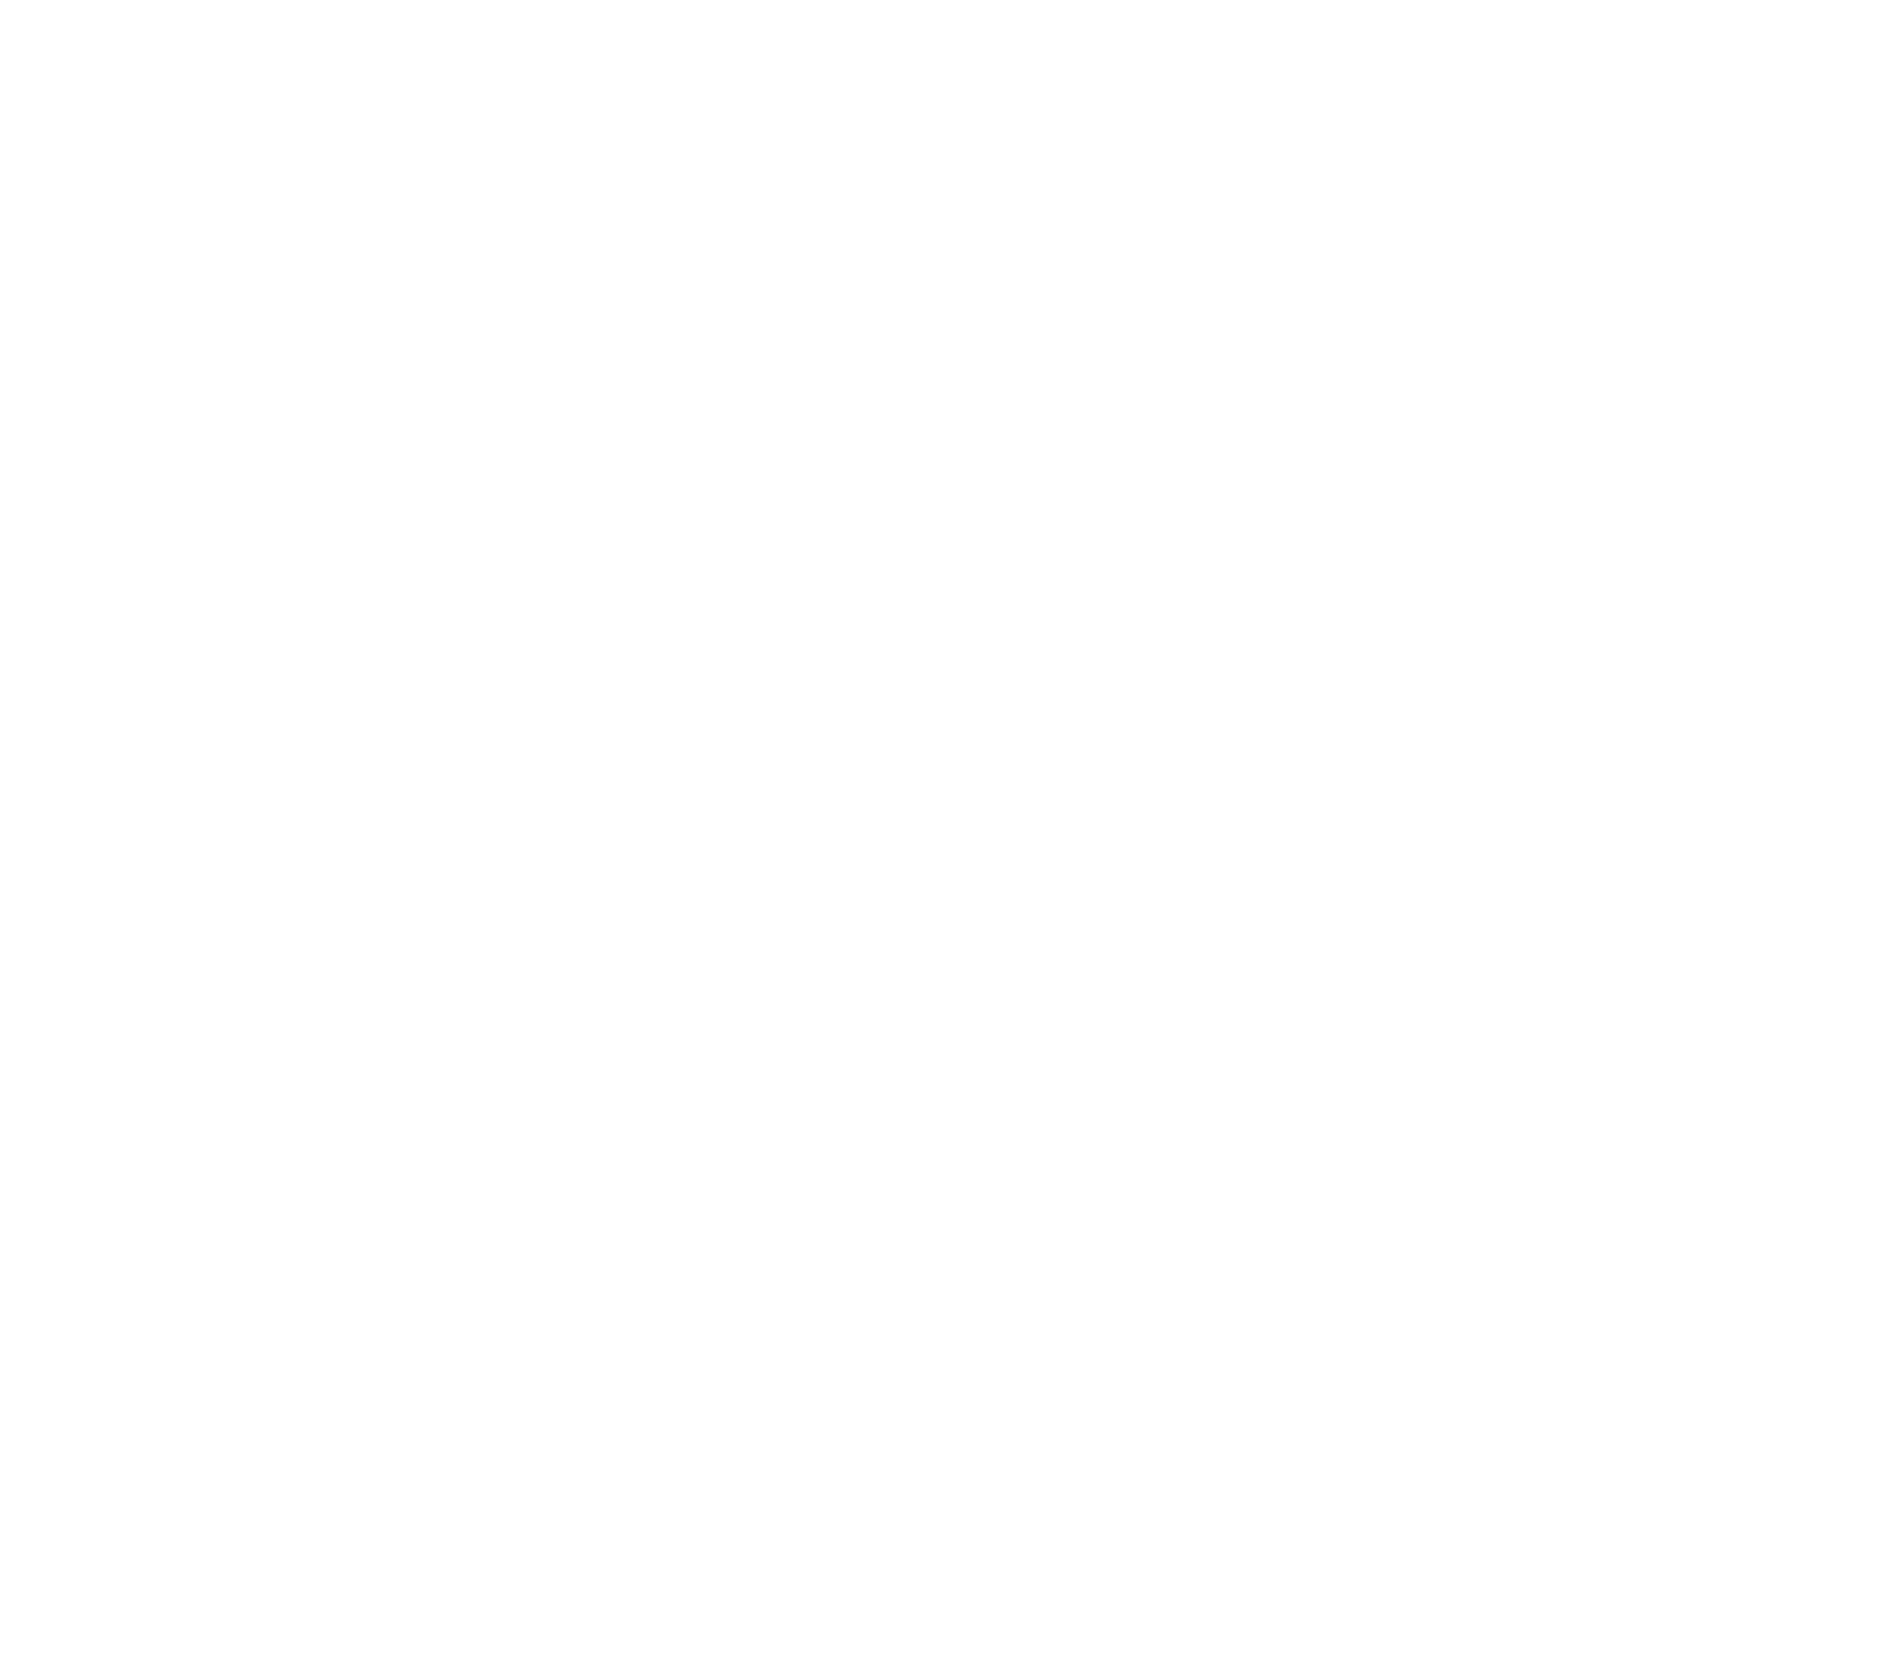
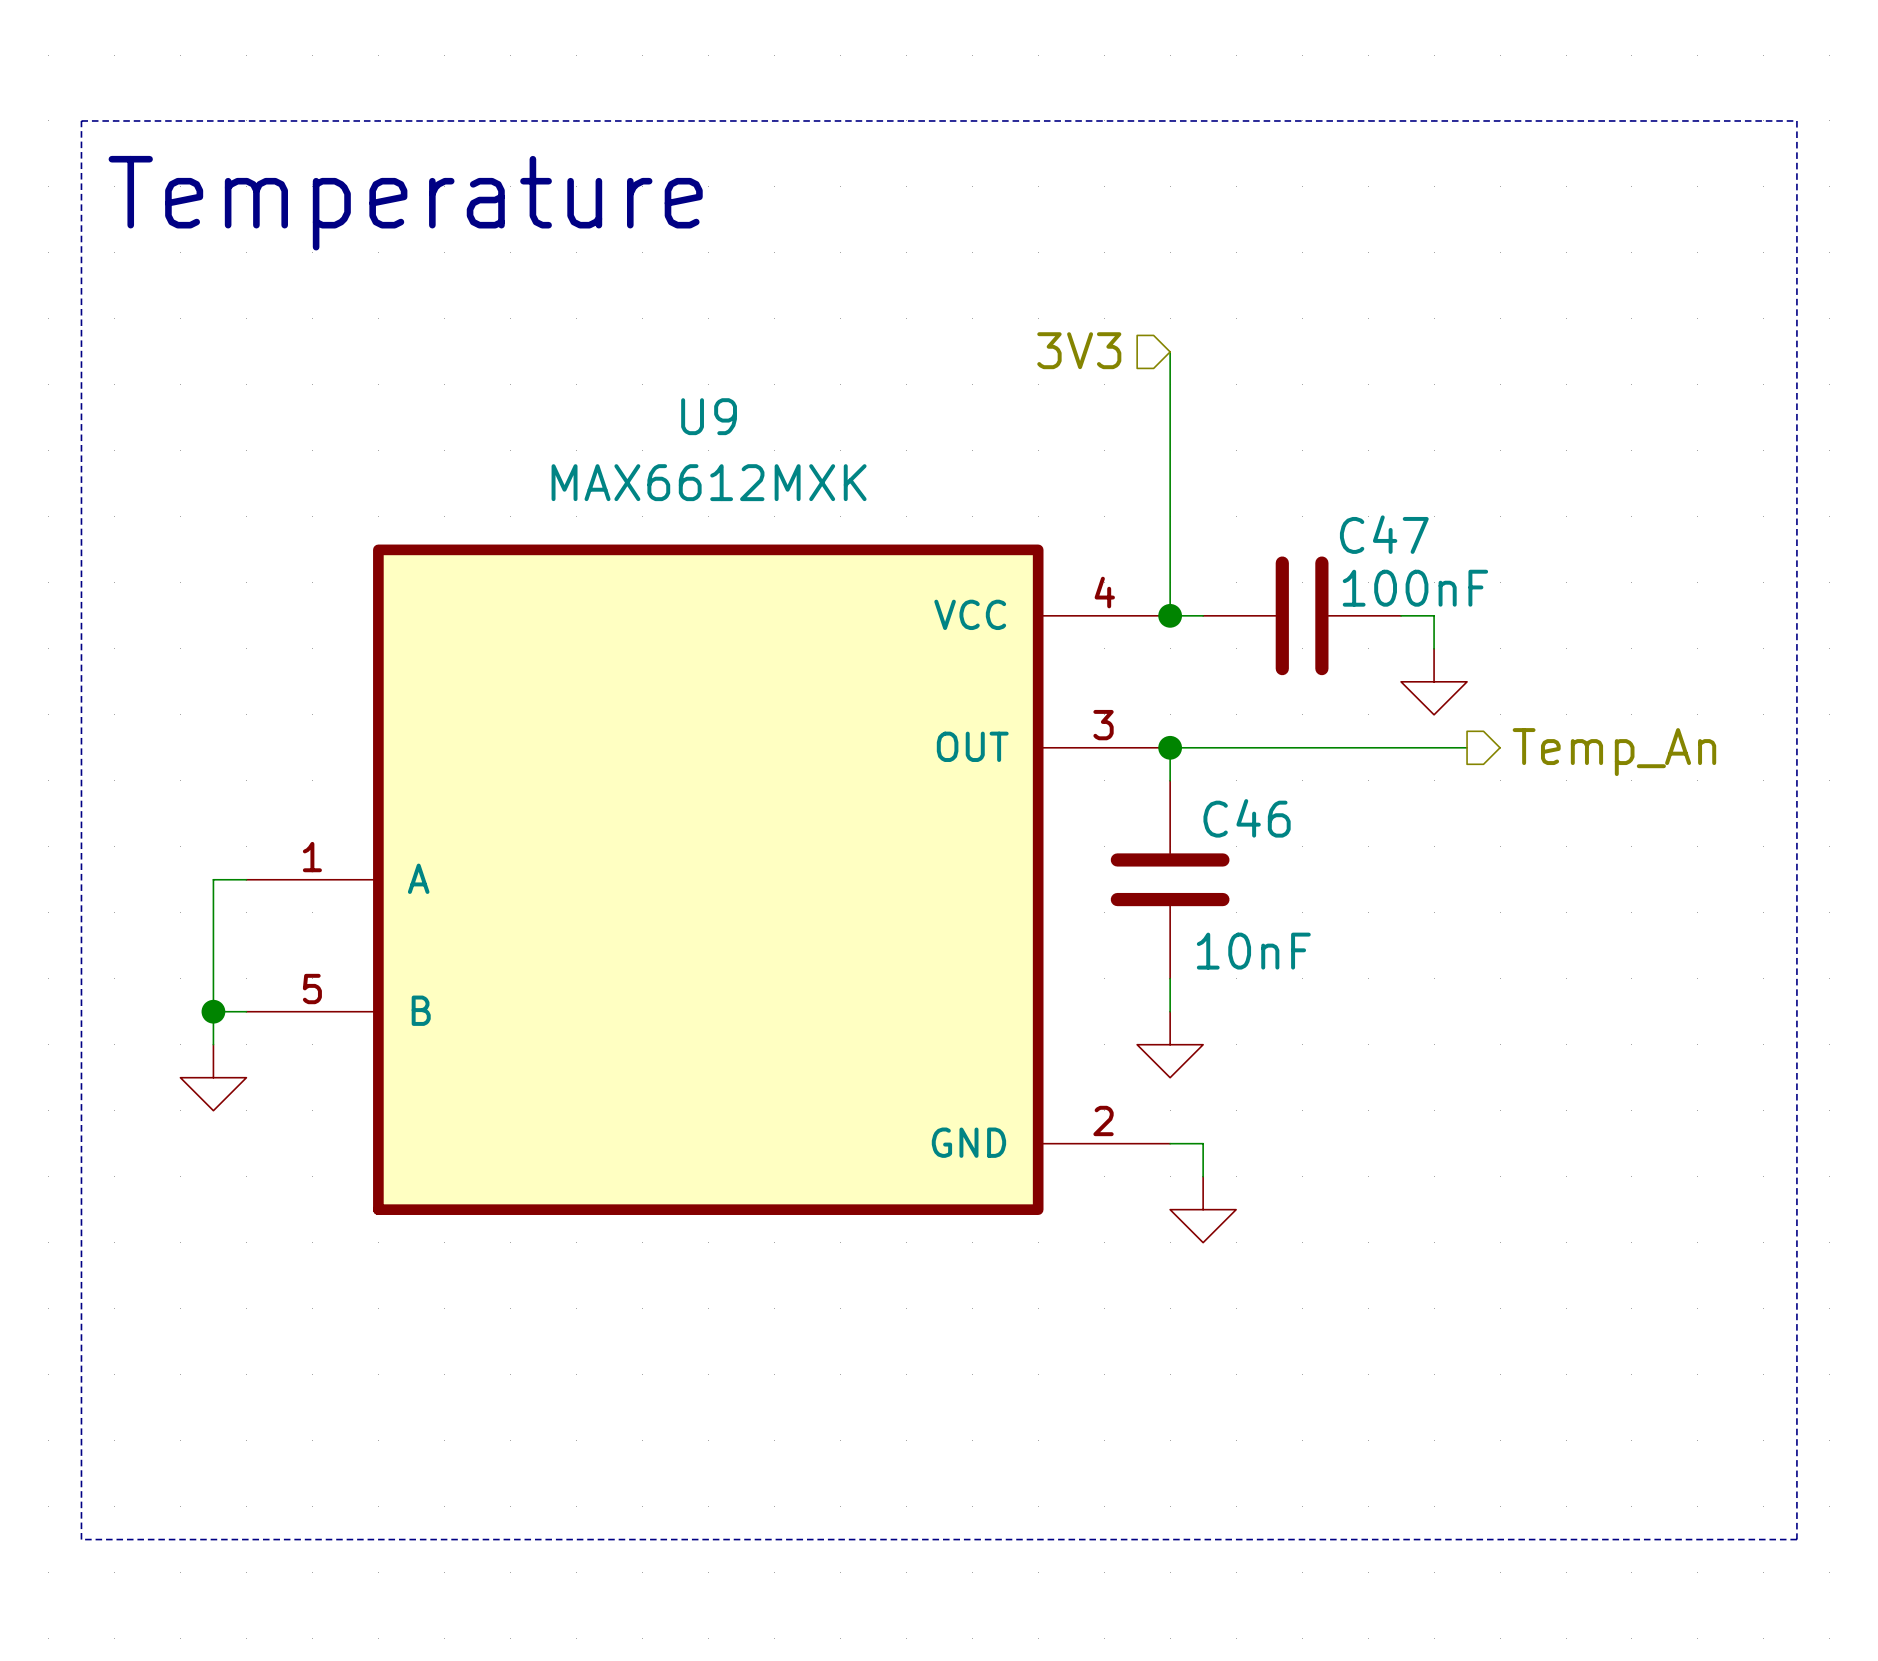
line: none -> (81, 120) (1796, 120) (1796, 1539) (81, 1539) (81, 120)
text: none -> Temperature (405, 203)
hierarchical label: none -> 3V3 (1079, 350)
wire: none -> (1170, 351) (1170, 615) (1203, 615)
junction: none -> (1170, 615)
C47: none -> 100nF (1302, 615)
wire: none -> (1401, 615) (1434, 615) (1434, 648)
power symbol: none -> (1434, 681)
junction: none -> (1170, 747)
wire: none -> (1467, 747) (1170, 747) (1170, 780)
hierarchical label: none -> Temp_An (1614, 752)
wire: none -> (246, 879) (213, 879) (213, 1044)
U9: none -> MAX6612MXK (708, 879)
C46: none -> 10nF (1170, 879)
wire: none -> (1170, 978) (1170, 1011)
wire: none -> (213, 1011) (246, 1011)
junction: none -> (213, 1011)
power symbol: none -> (1170, 1044)
power symbol: none -> (213, 1077)
wire: none -> (1170, 1143) (1203, 1143) (1203, 1176)
power symbol: none -> (1203, 1209)

